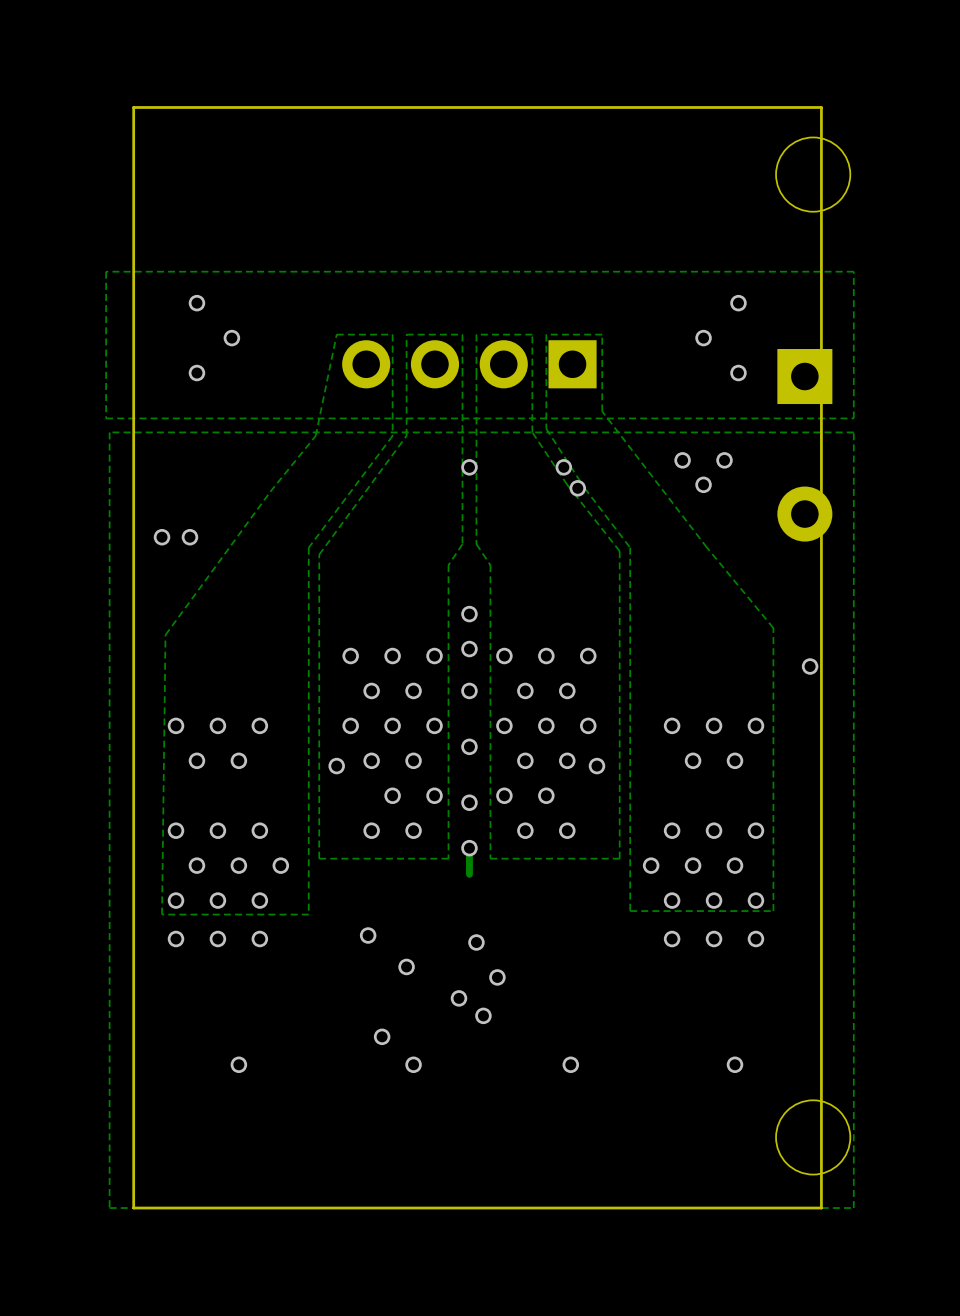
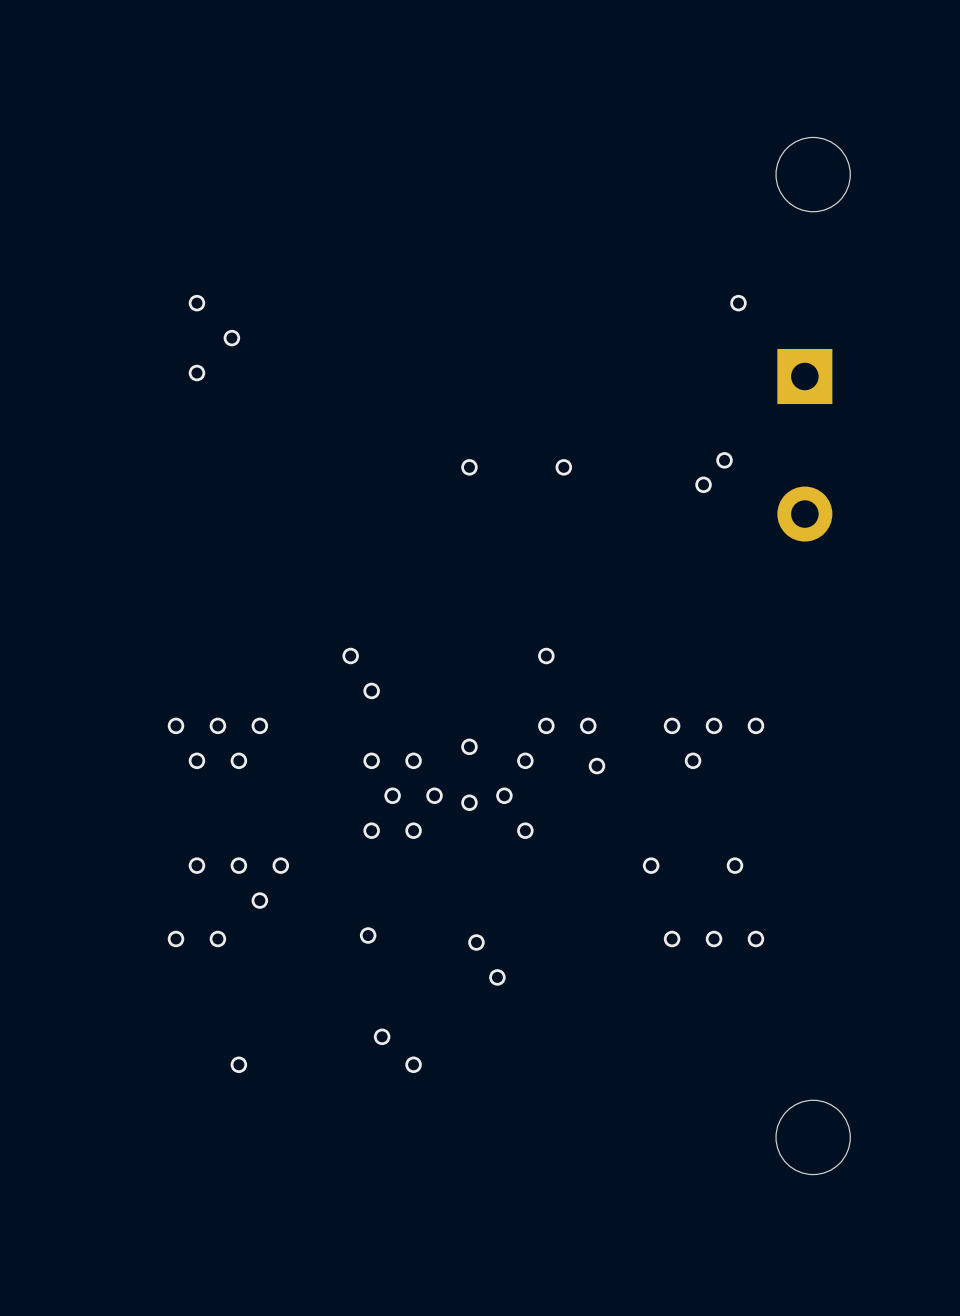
board edge: (821, 107) (821, 1208) (133, 1208) (133, 107) (821, 107) -> none
zone outline: (853, 271) (853, 418) (106, 418) (106, 271) (853, 271) -> none
zone outline: (392, 334) (336, 334) (315, 435) (270, 491) (165, 635) (162, 914) (308, 914) (308, 547) (392, 435) (392, 334) -> none
zone outline: (462, 334) (406, 334) (406, 435) (319, 554) (319, 858) (448, 858) (448, 565) (462, 544) (462, 334) -> none
zone outline: (532, 334) (476, 334) (476, 544) (490, 565) (490, 858) (619, 858) (619, 551) (567, 484) (532, 432) (532, 334) -> none
zone outline: (602, 334) (602, 411) (707, 547) (773, 628) (773, 911) (630, 911) (630, 547) (584, 488) (546, 428) (546, 334) (602, 334) -> none
via: (703, 338) -> none
part: (469, 364) -> none
via: (738, 373) -> none
zone outline: (853, 432) (109, 432) (109, 1208) (853, 1208) (853, 432) -> none
via: (682, 460) -> none
via: (577, 488) -> none
via: (162, 537) -> none
via: (189, 537) -> none
via: (469, 614) -> none
via: (469, 649) -> none
via: (392, 656) -> none
via: (434, 656) -> none
via: (504, 656) -> none
via: (588, 656) -> none
via: (810, 666) -> none
via: (413, 690) -> none
via: (469, 690) -> none
via: (525, 690) -> none
via: (567, 690) -> none
via: (350, 725) -> none
via: (392, 725) -> none
via: (434, 725) -> none
via: (504, 725) -> none
via: (567, 760) -> none
via: (734, 760) -> none
via: (336, 766) -> none
via: (546, 795) -> none
via: (175, 830) -> none
via: (217, 830) -> none
via: (259, 830) -> none
via: (567, 830) -> none
via: (672, 830) -> none
via: (714, 830) -> none
via: (755, 830) -> none
track: (469, 848) (469, 874) -> none
via: (469, 848) -> none
via: (693, 865) -> none
via: (175, 900) -> none
via: (217, 900) -> none
via: (672, 900) -> none
via: (714, 900) -> none
via: (755, 900) -> none
via: (259, 939) -> none
via: (406, 966) -> none
via: (458, 998) -> none
via: (483, 1015) -> none
via: (570, 1064) -> none
via: (734, 1064) -> none

